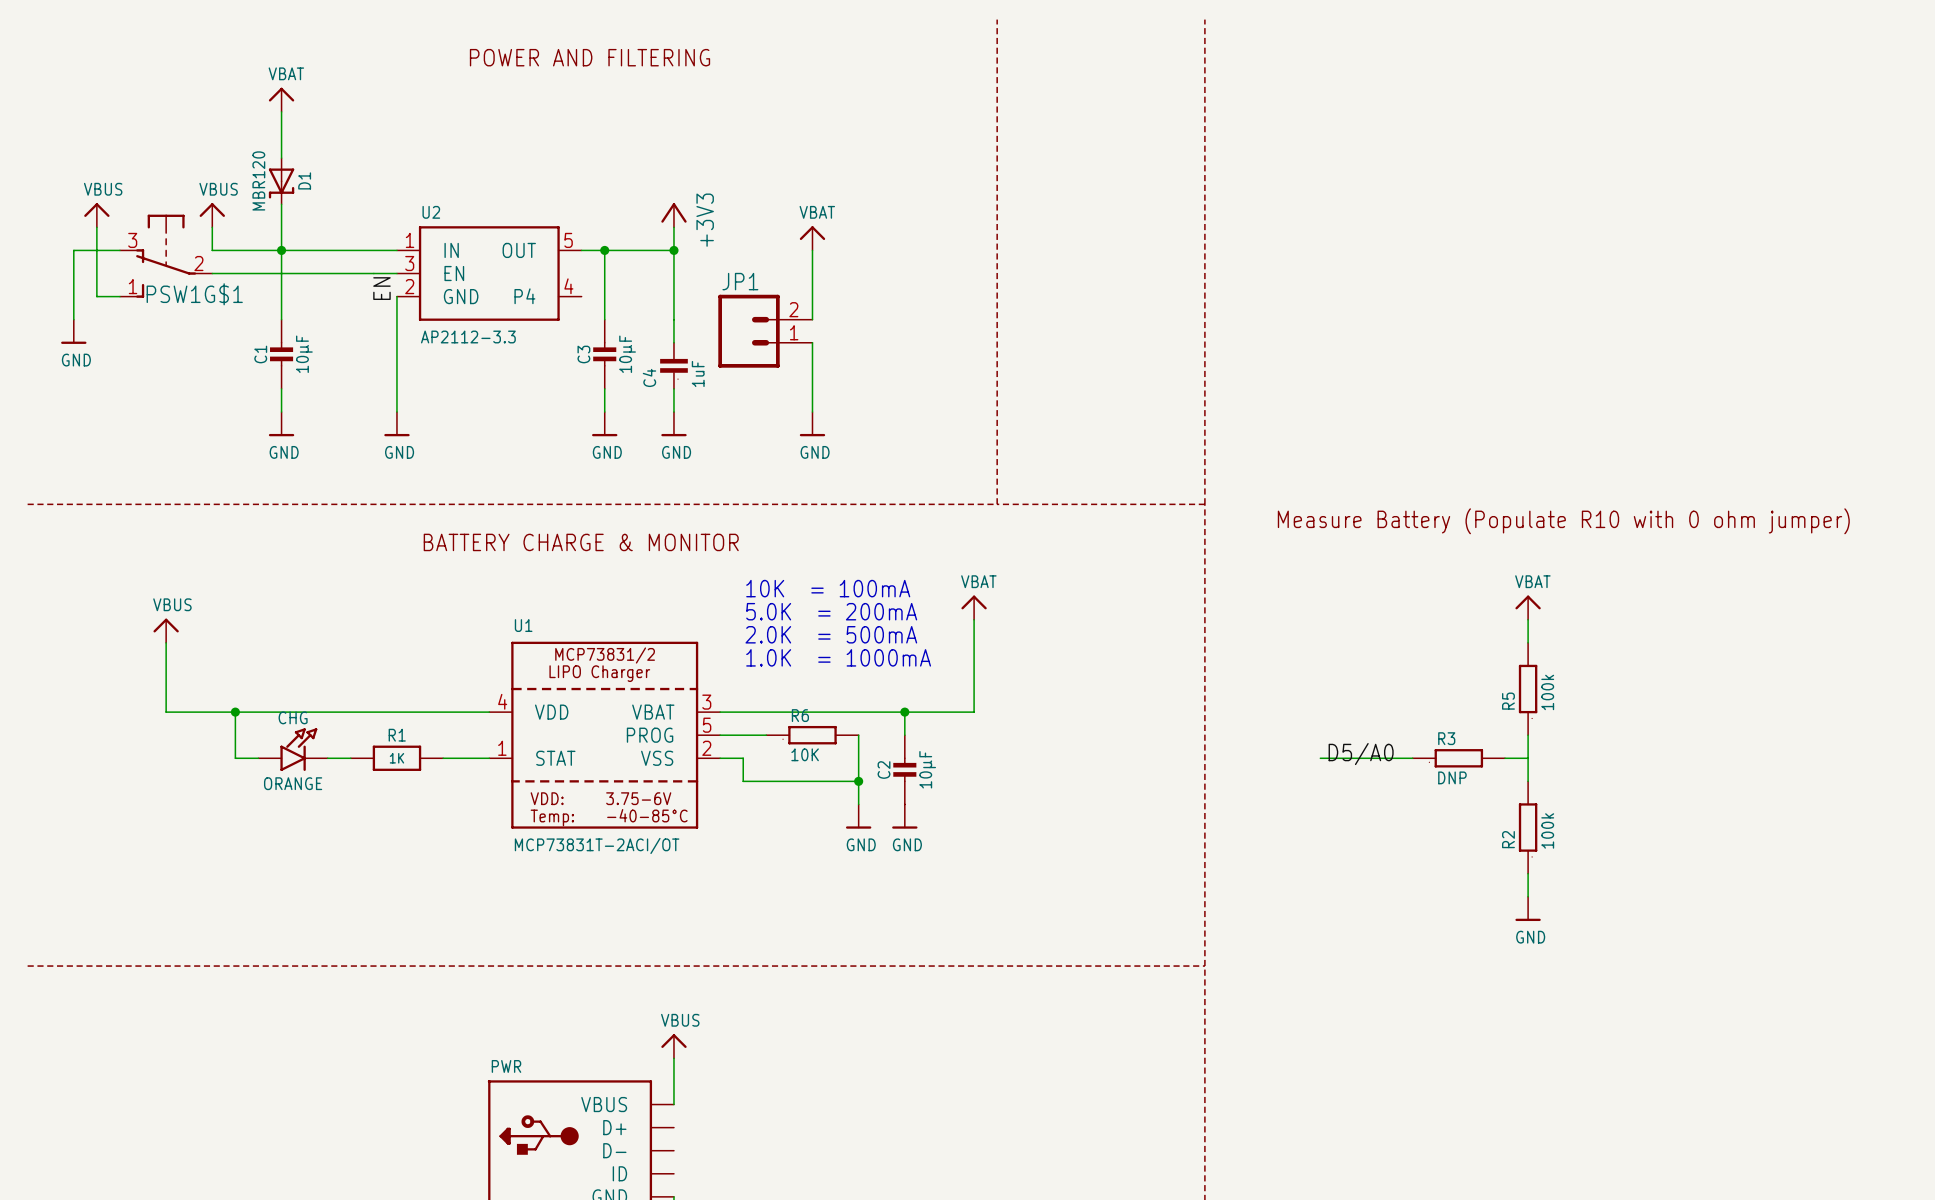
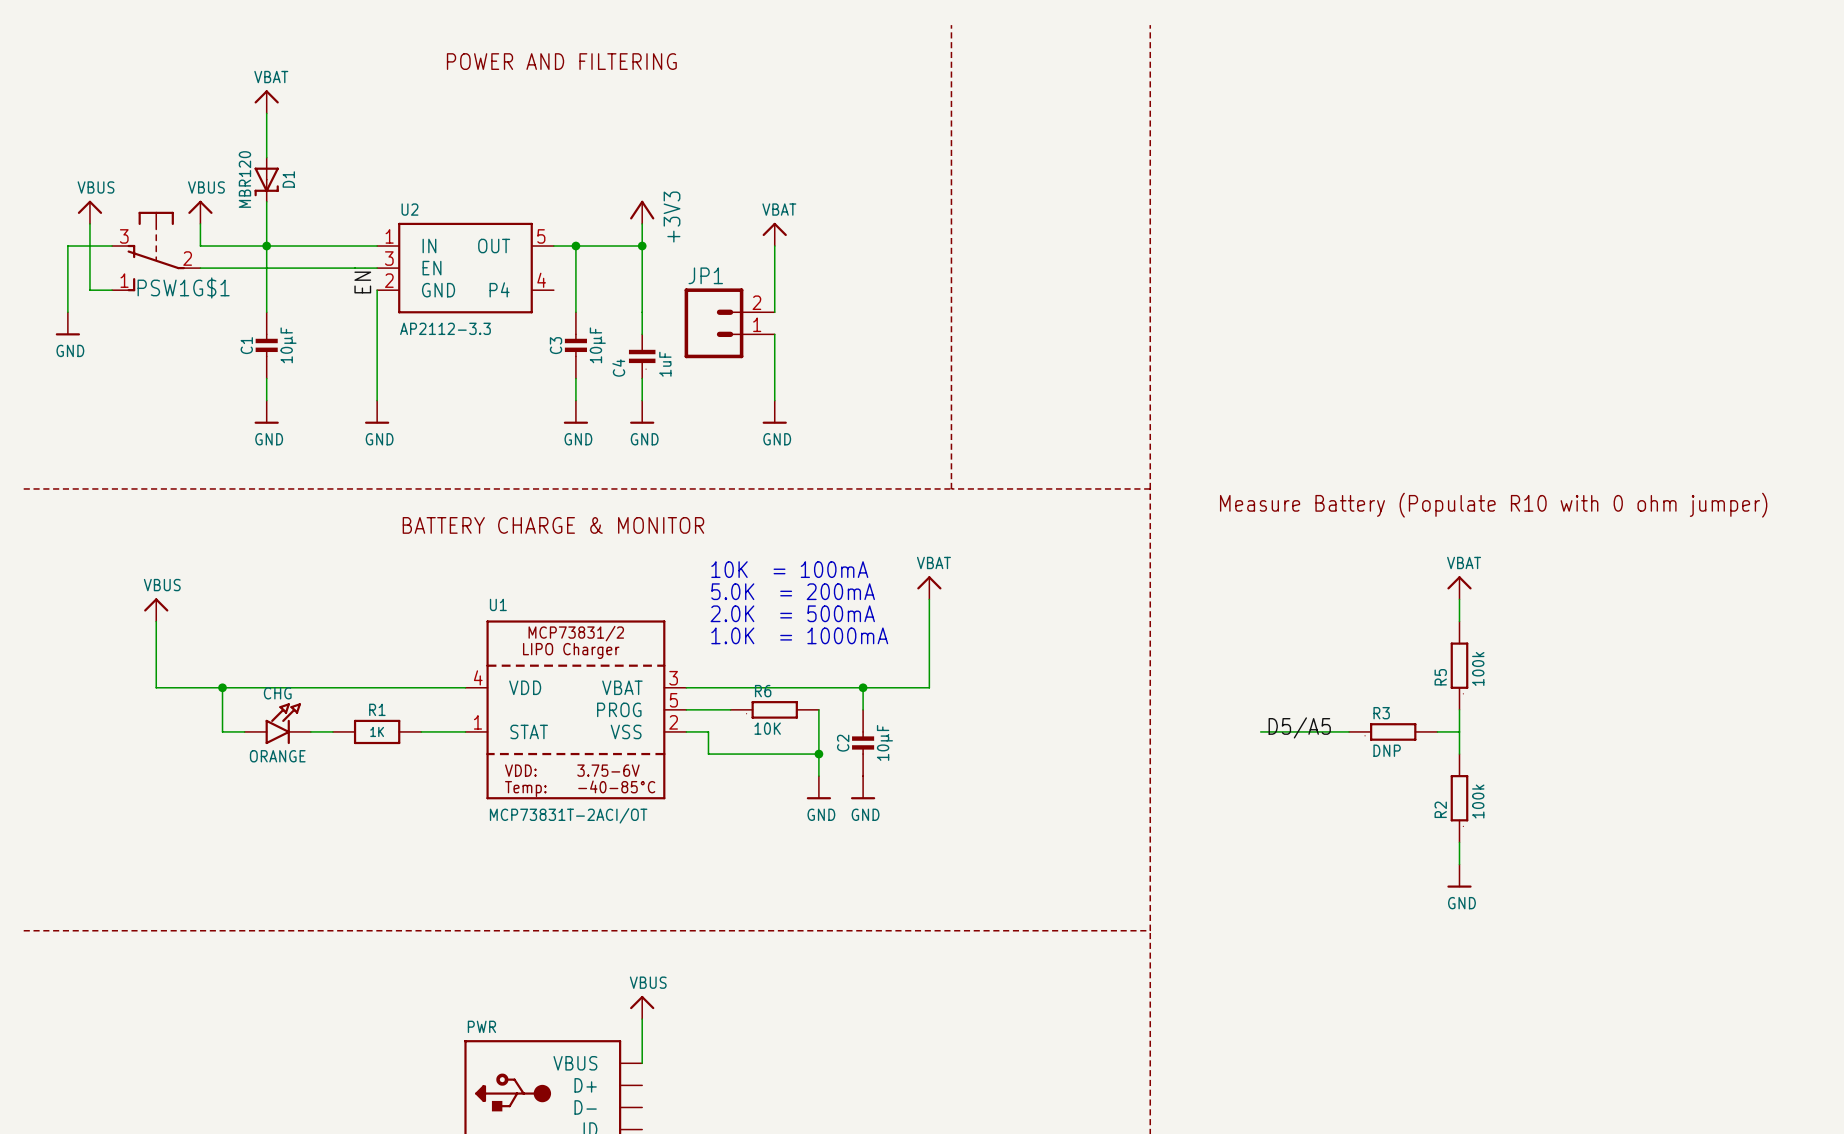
label: D5/A0 (1361, 754) -> D5/A5 (1299, 727)

